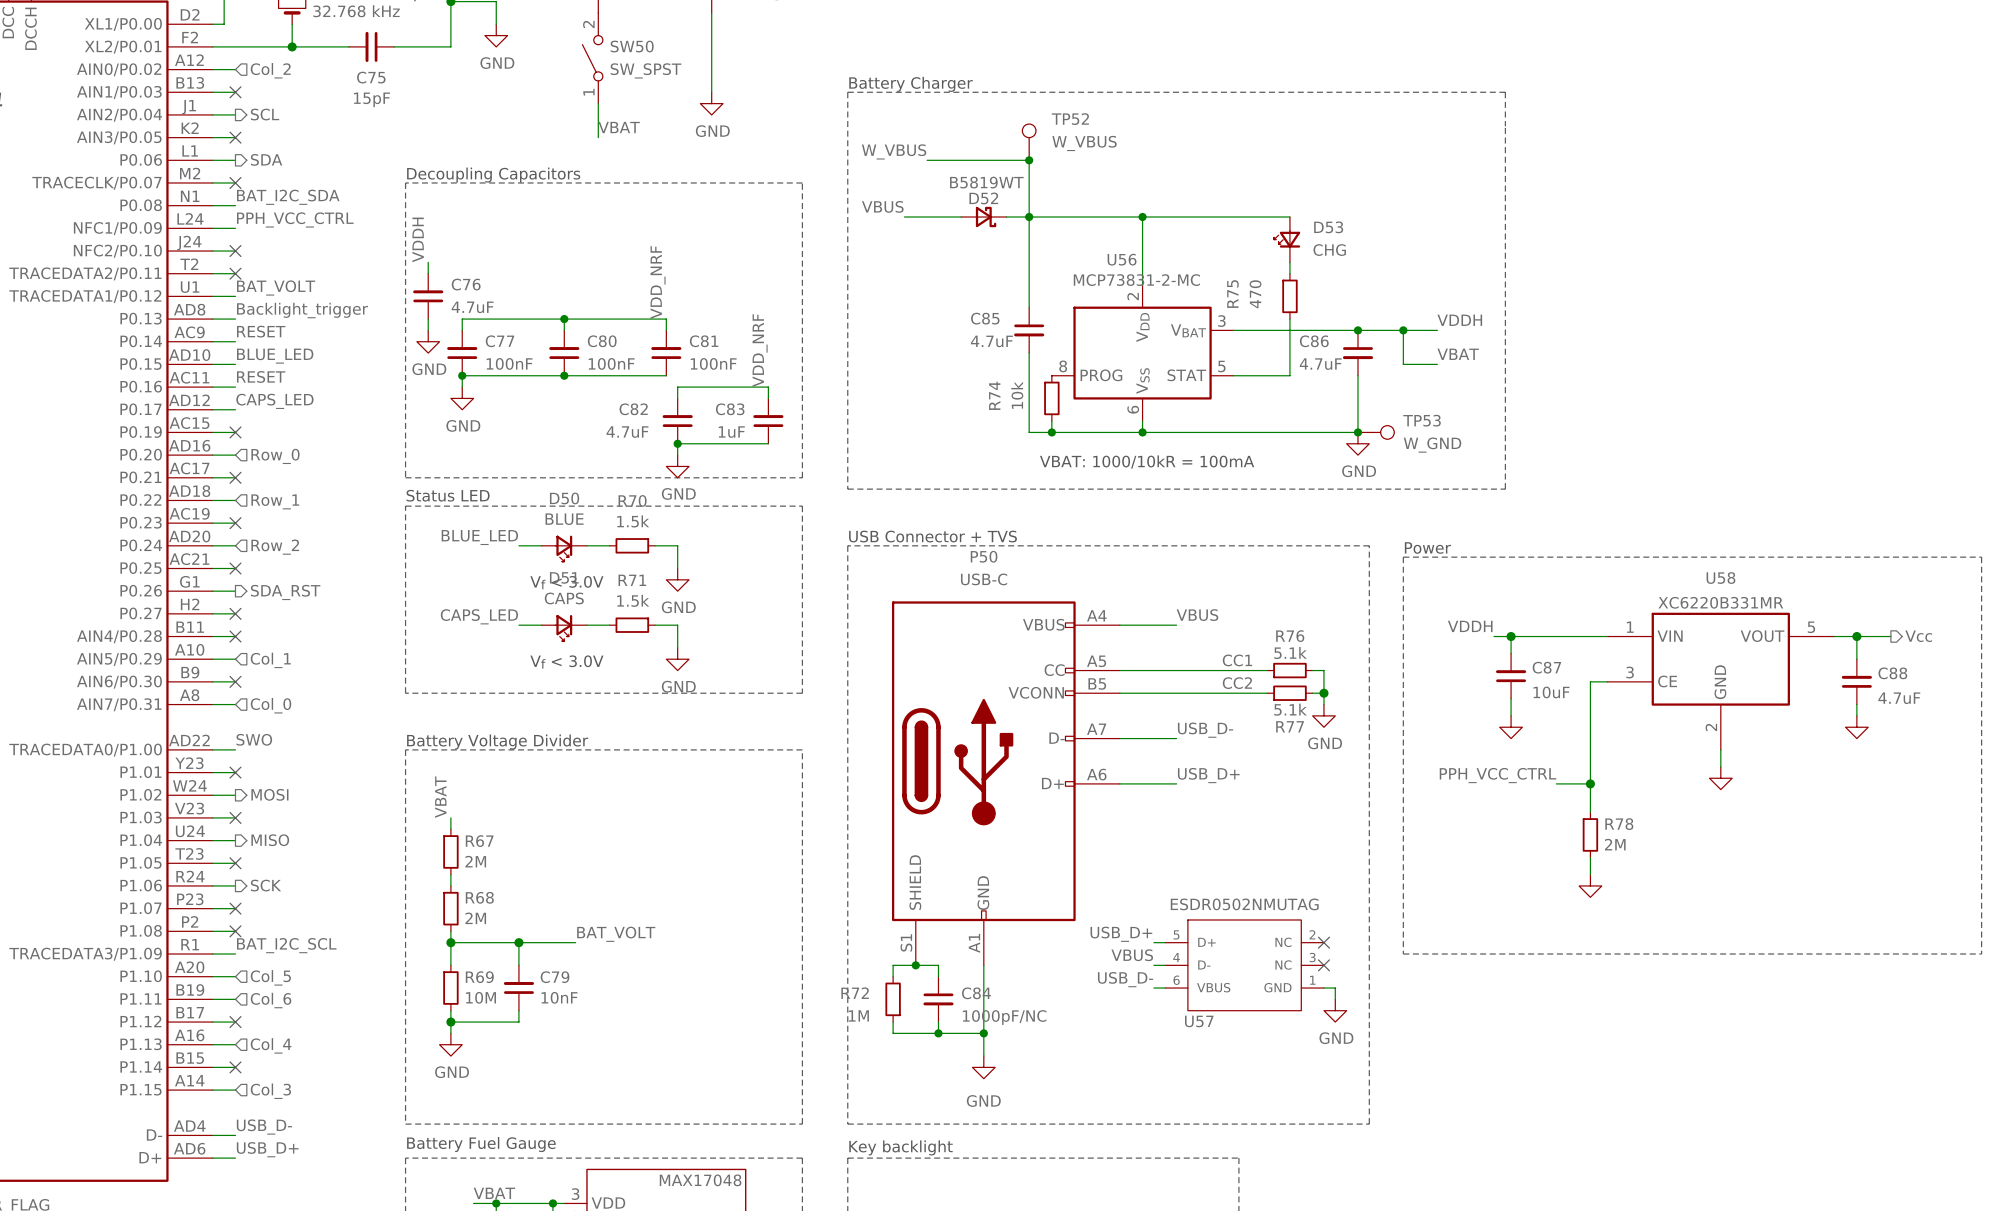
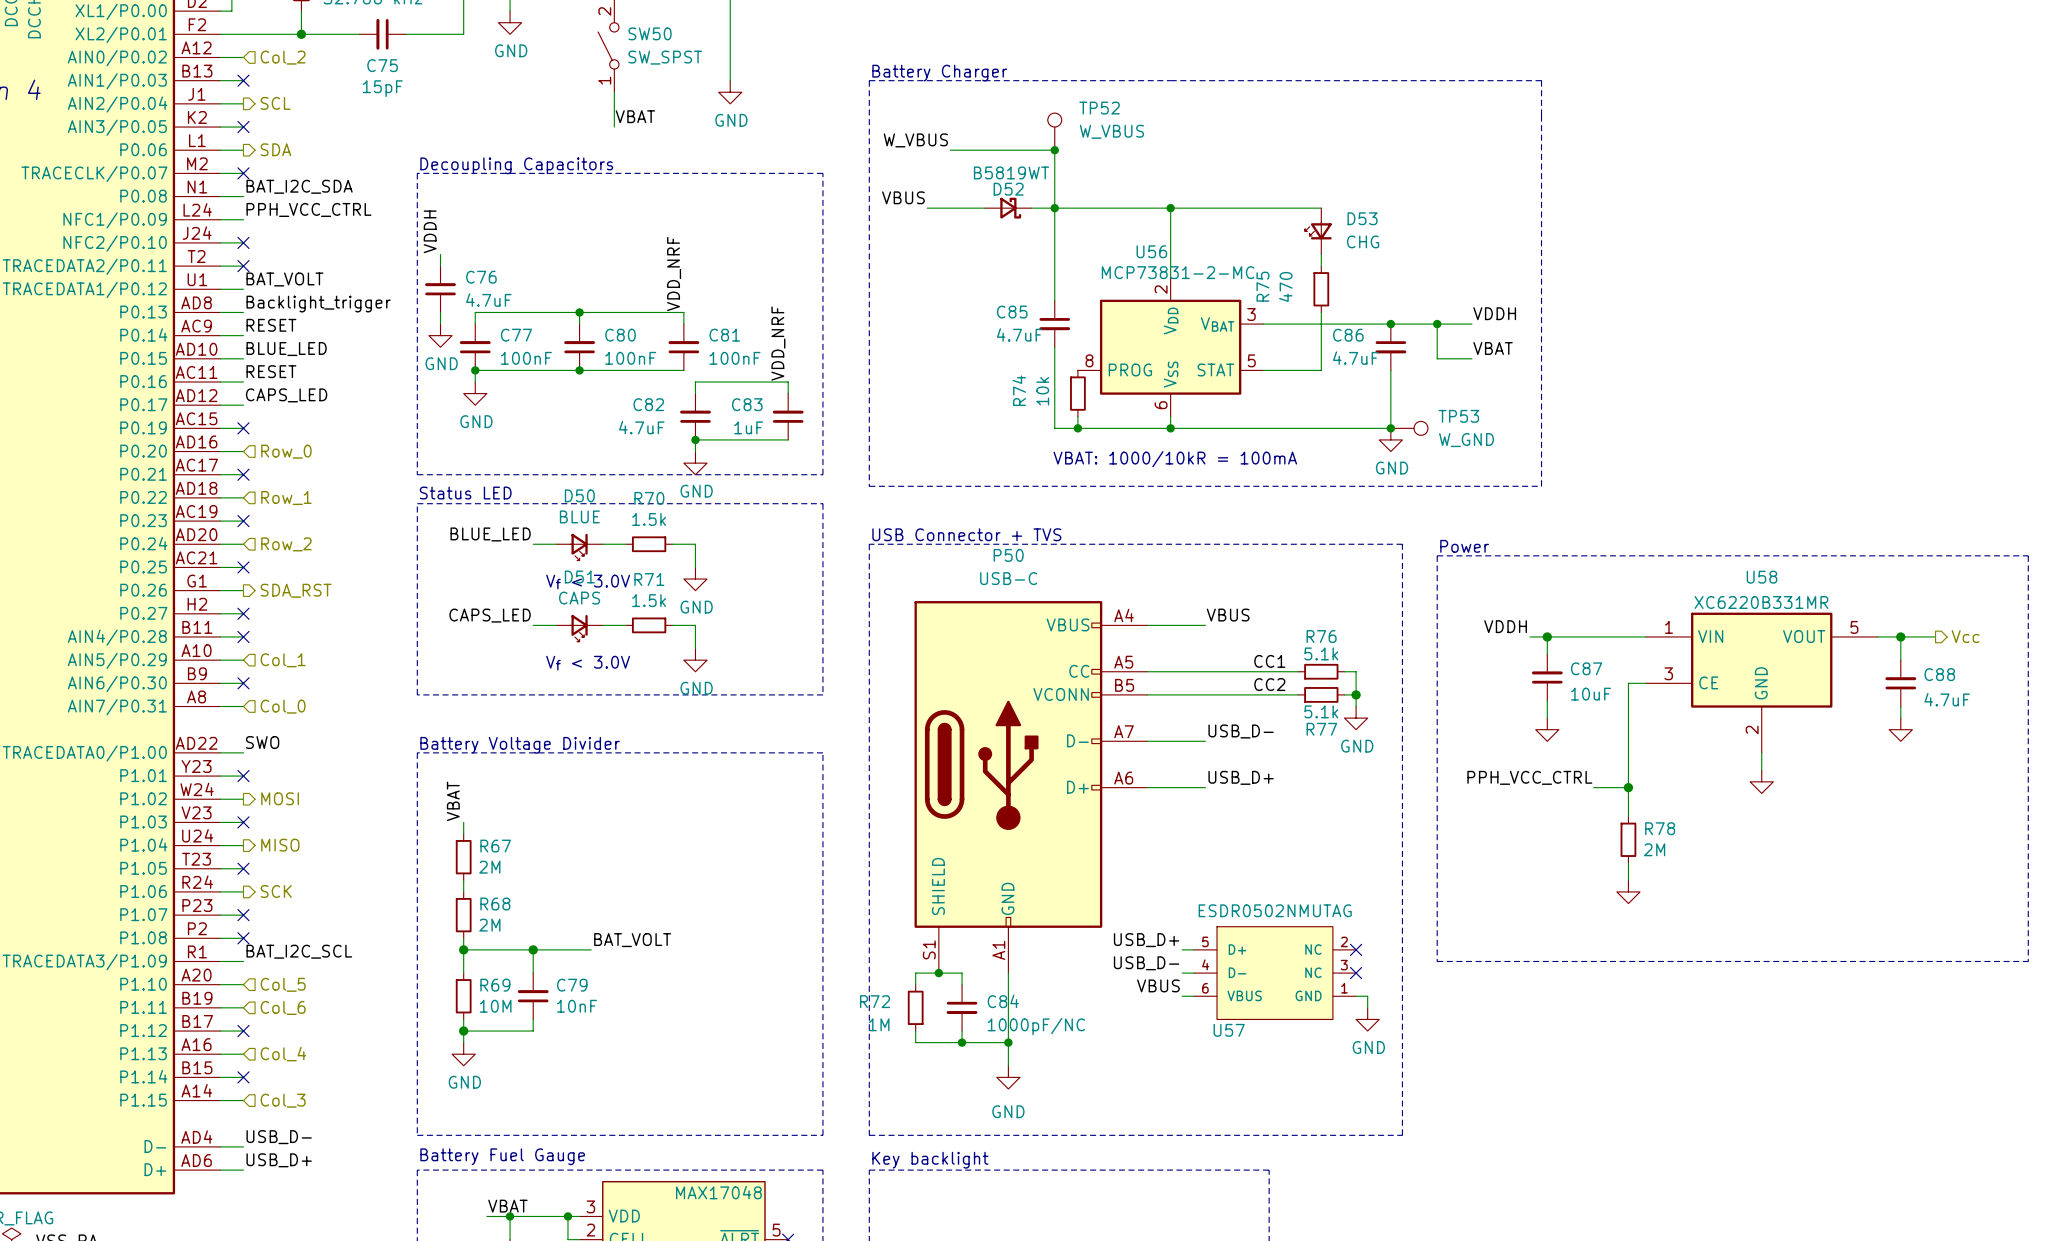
label: VBUS (1132, 955) -> USB_D- (1146, 963)
label: USB_D- (1125, 979) -> VBUS (1158, 985)

